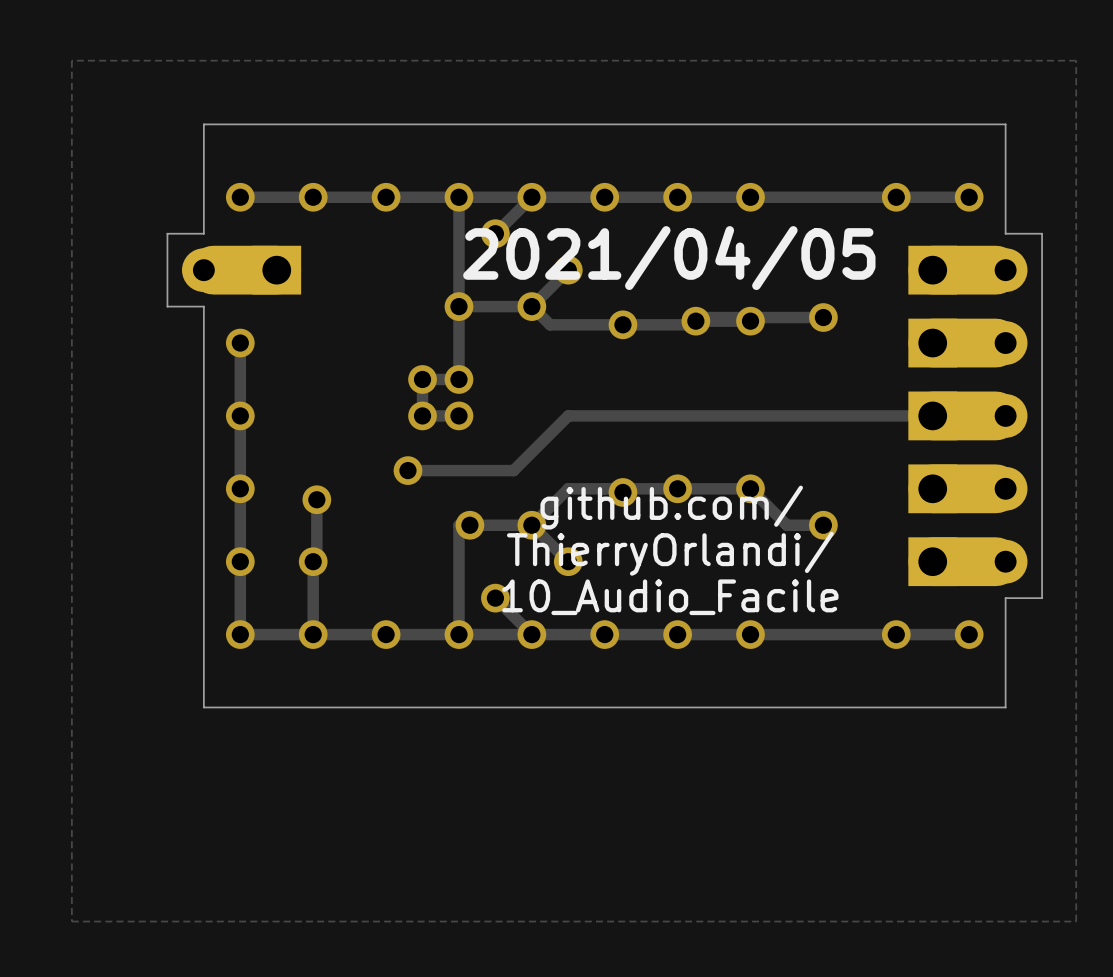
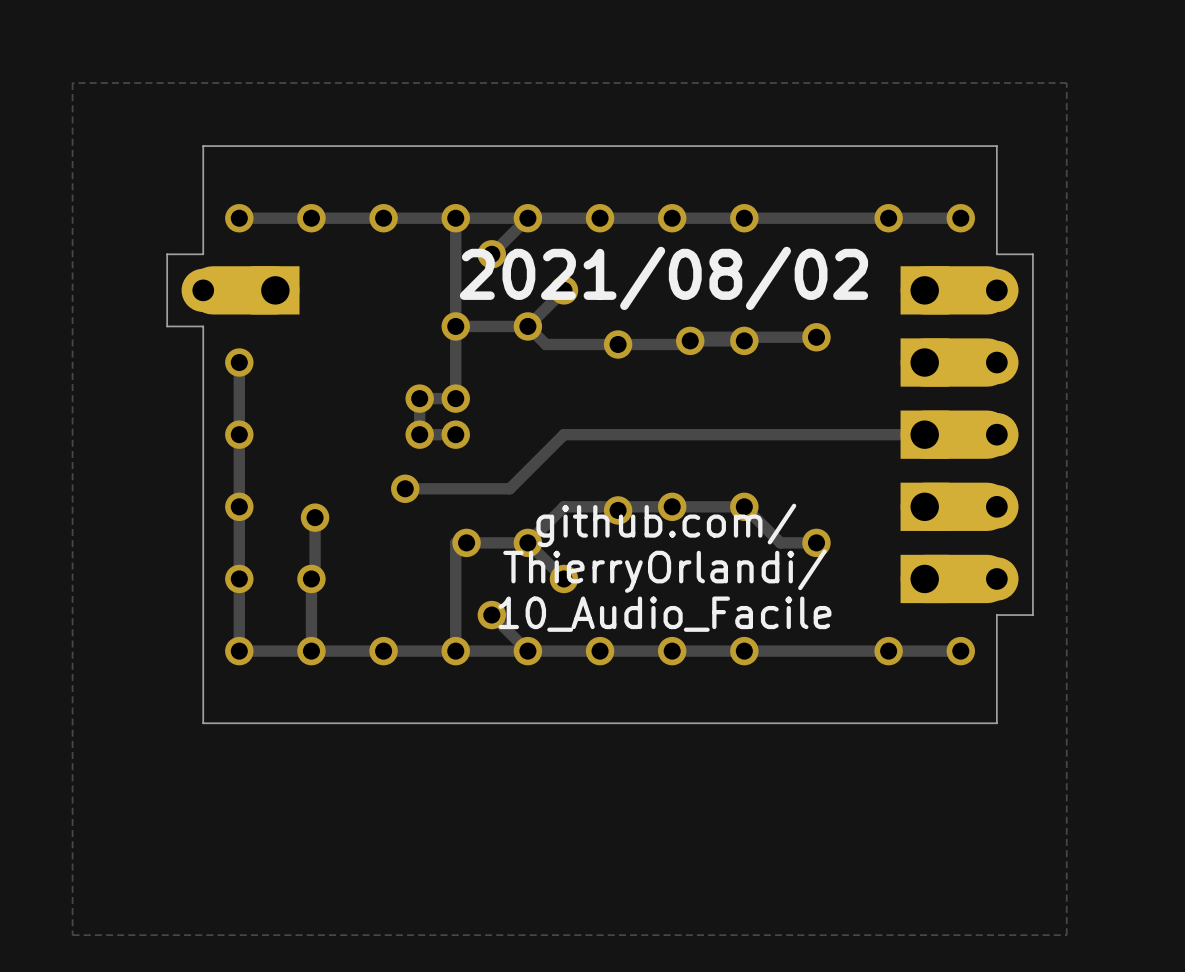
text: 2021/04/05 (669, 258) -> 2021/08/02 (663, 278)

